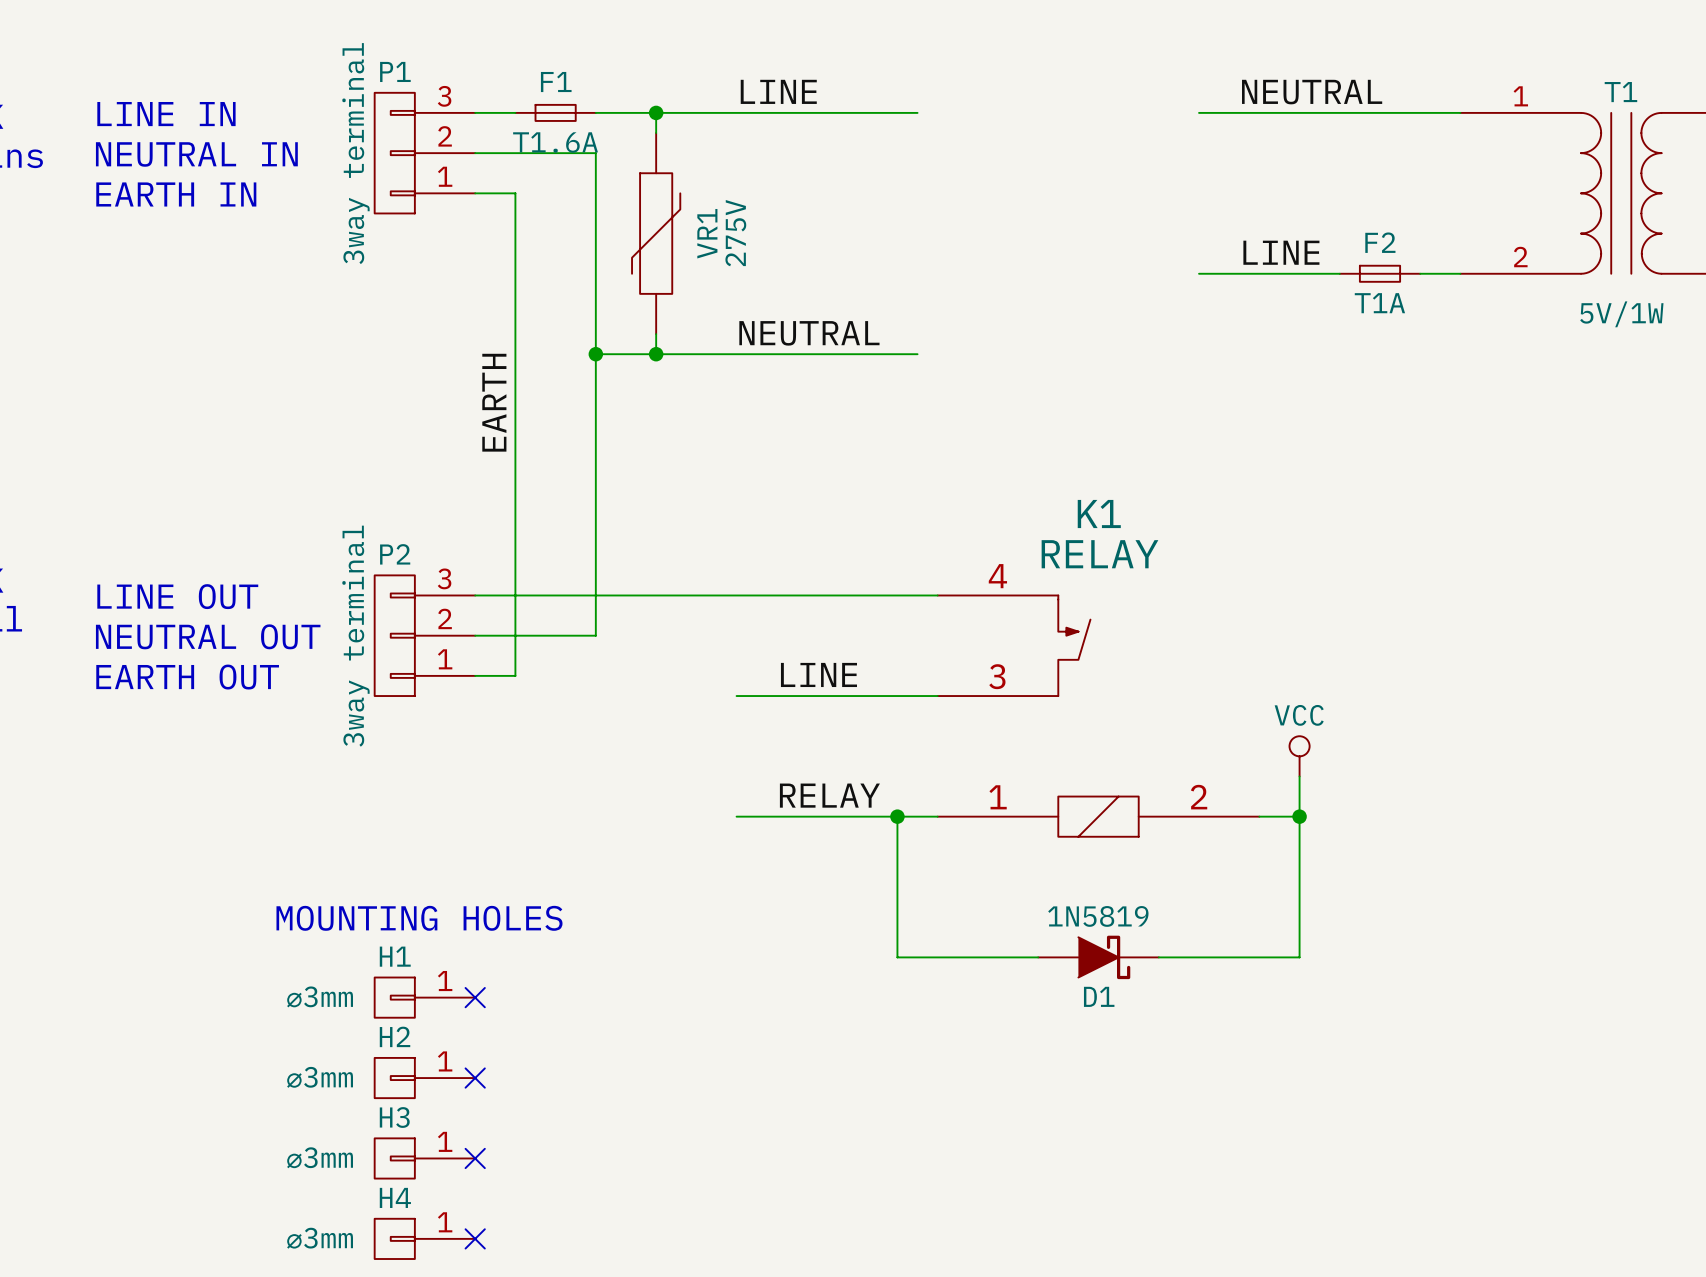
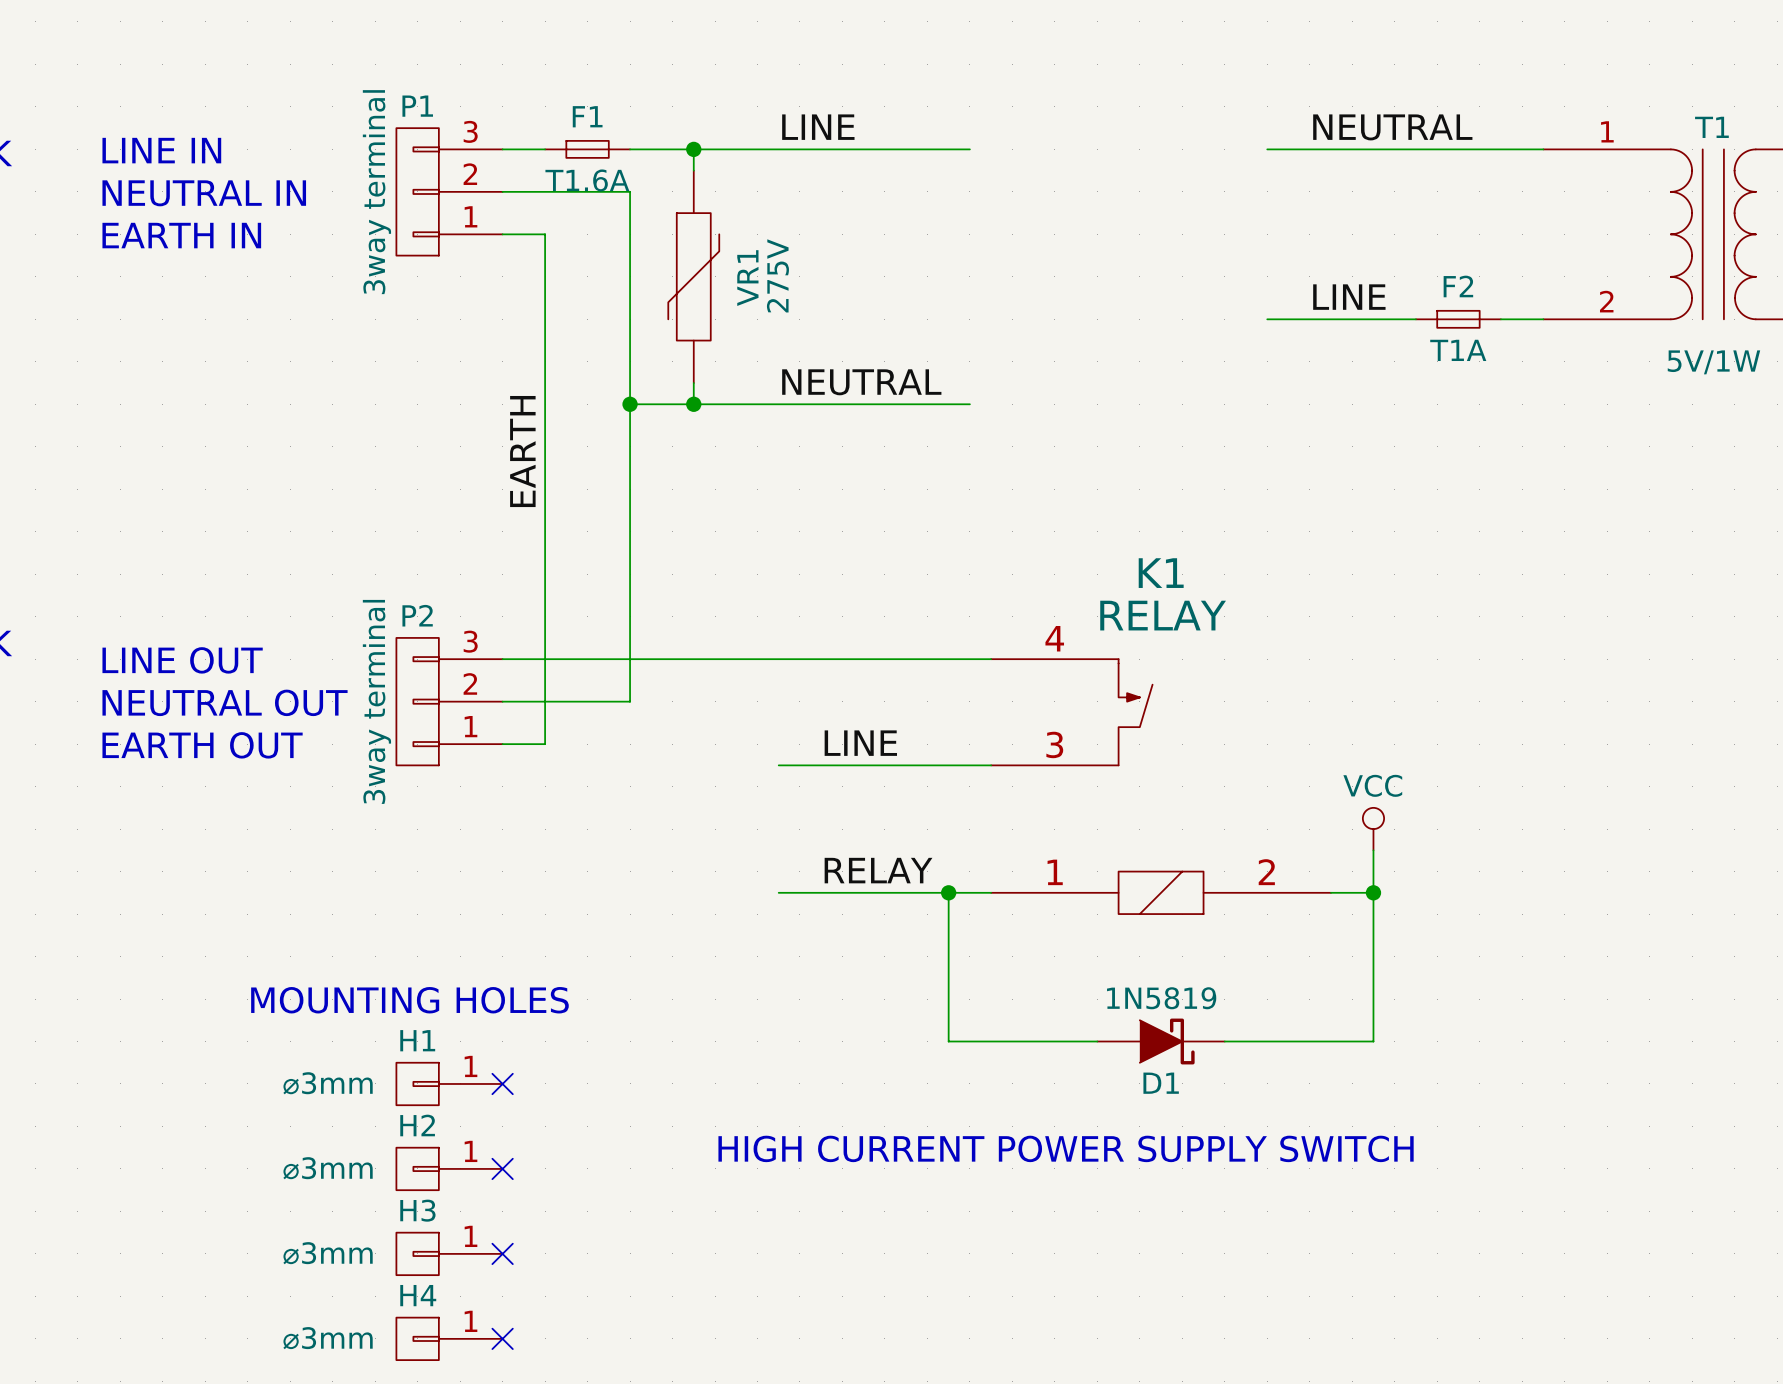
text position: MOUNTING HOLES (419, 918) -> MOUNTING HOLES (409, 1000)
text: none -> HIGH CURRENT POWER SUPPLY SWITCH (1066, 1148)

